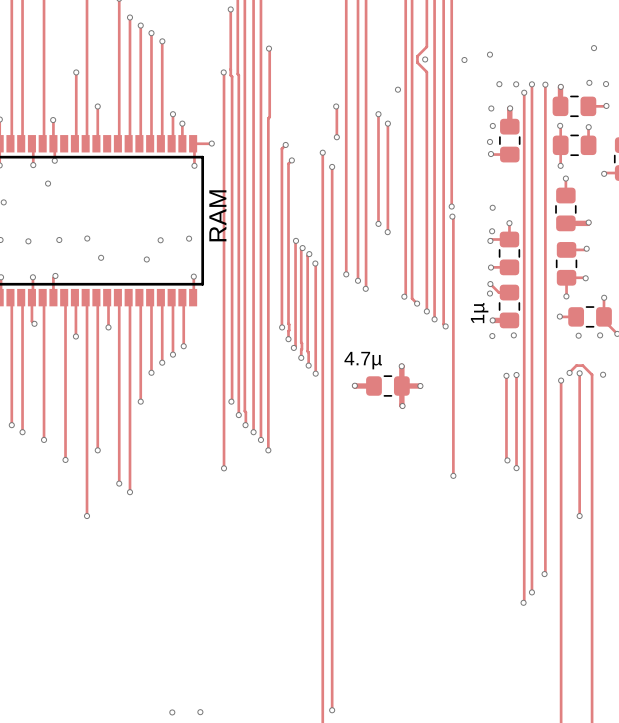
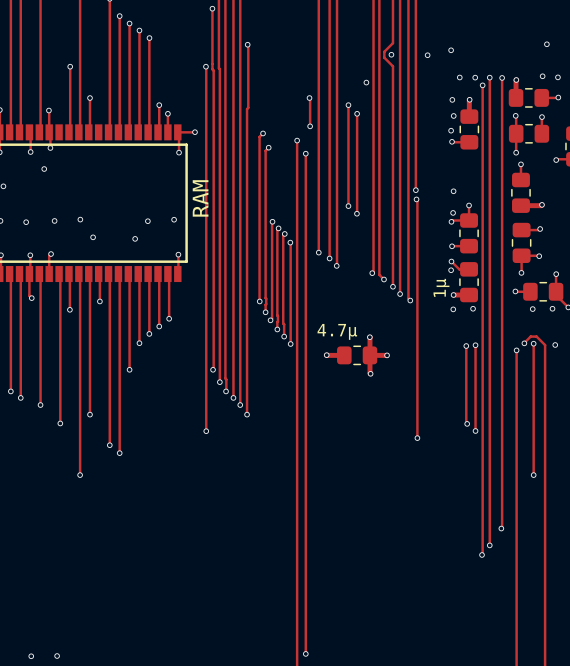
via: none -> (31, 656)
via: none -> (57, 656)
via: (172, 712) -> none
via: (200, 712) -> none

